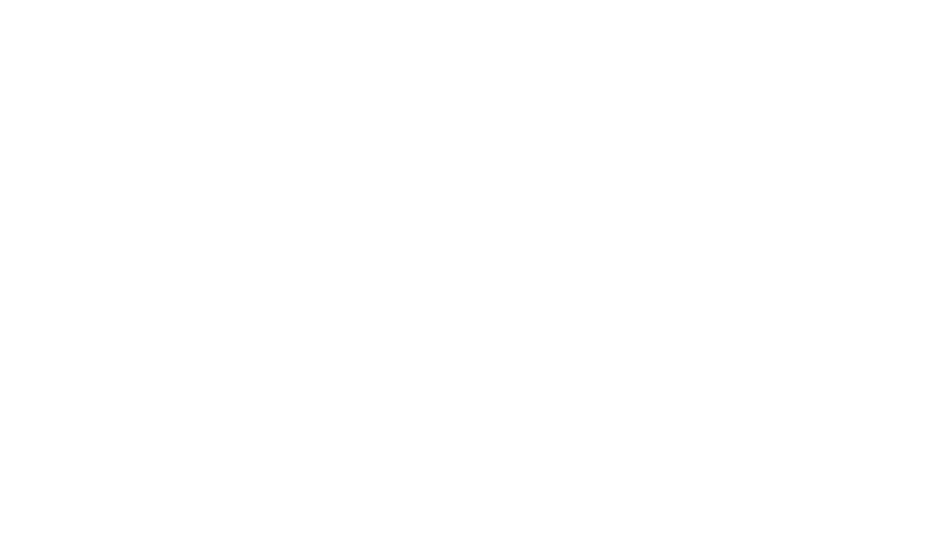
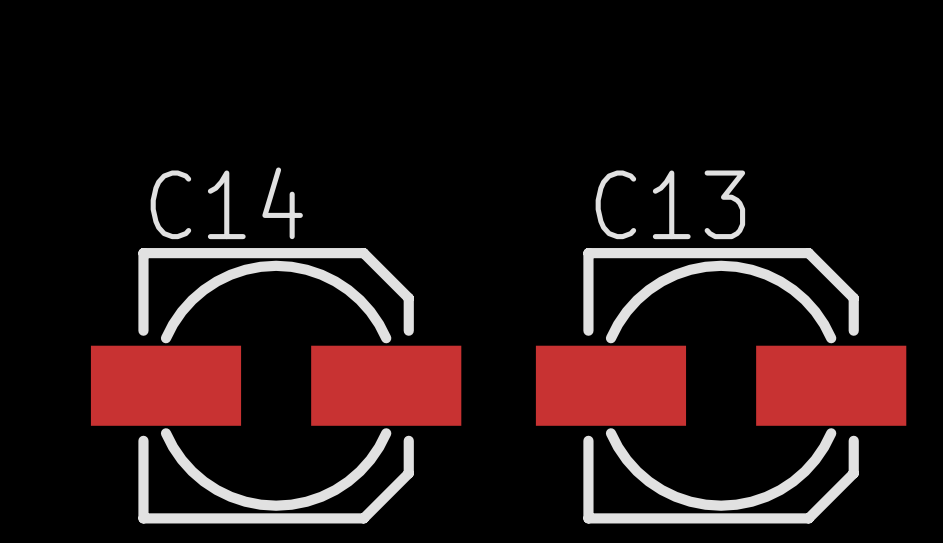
C14: none -> (276, 385)
C13: none -> (721, 385)

